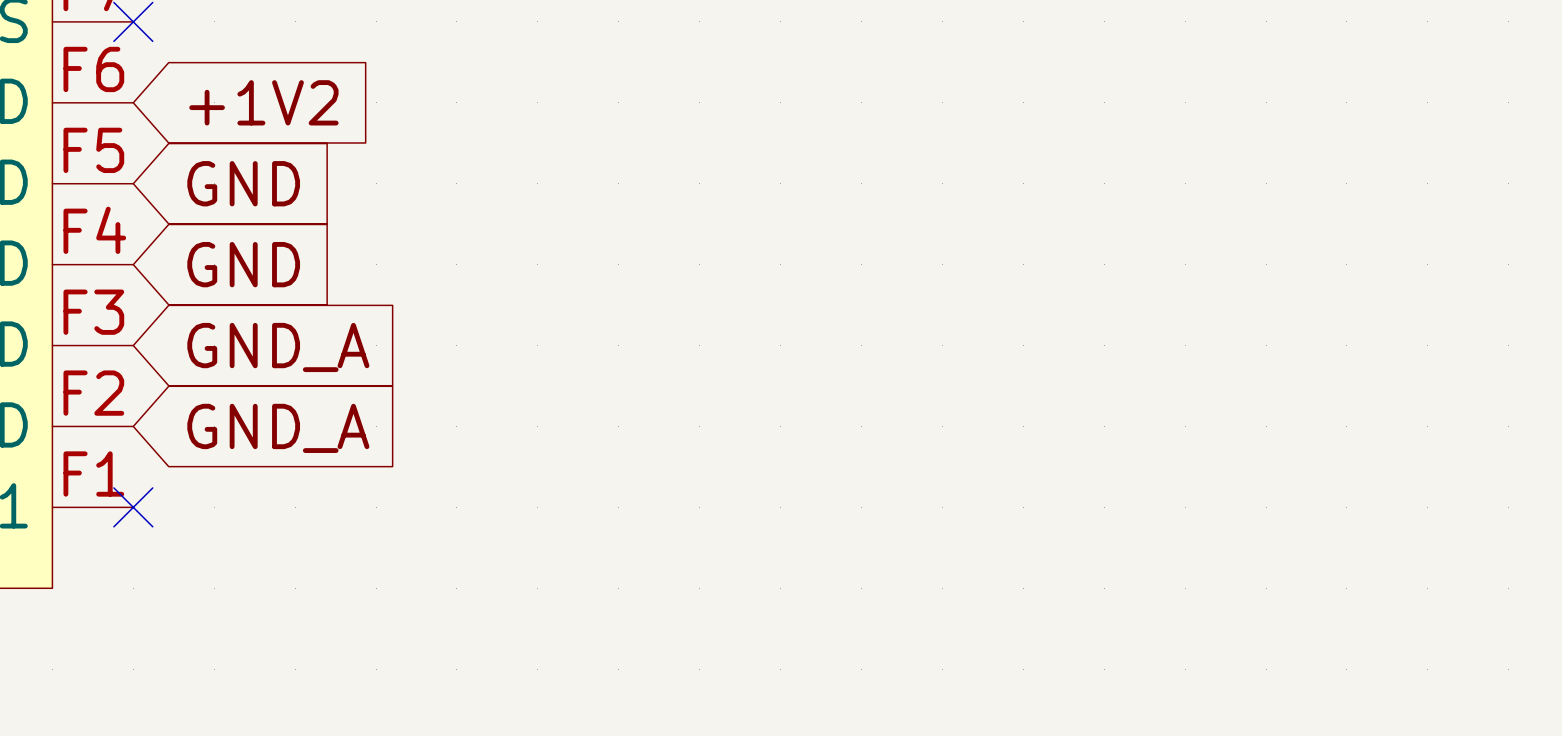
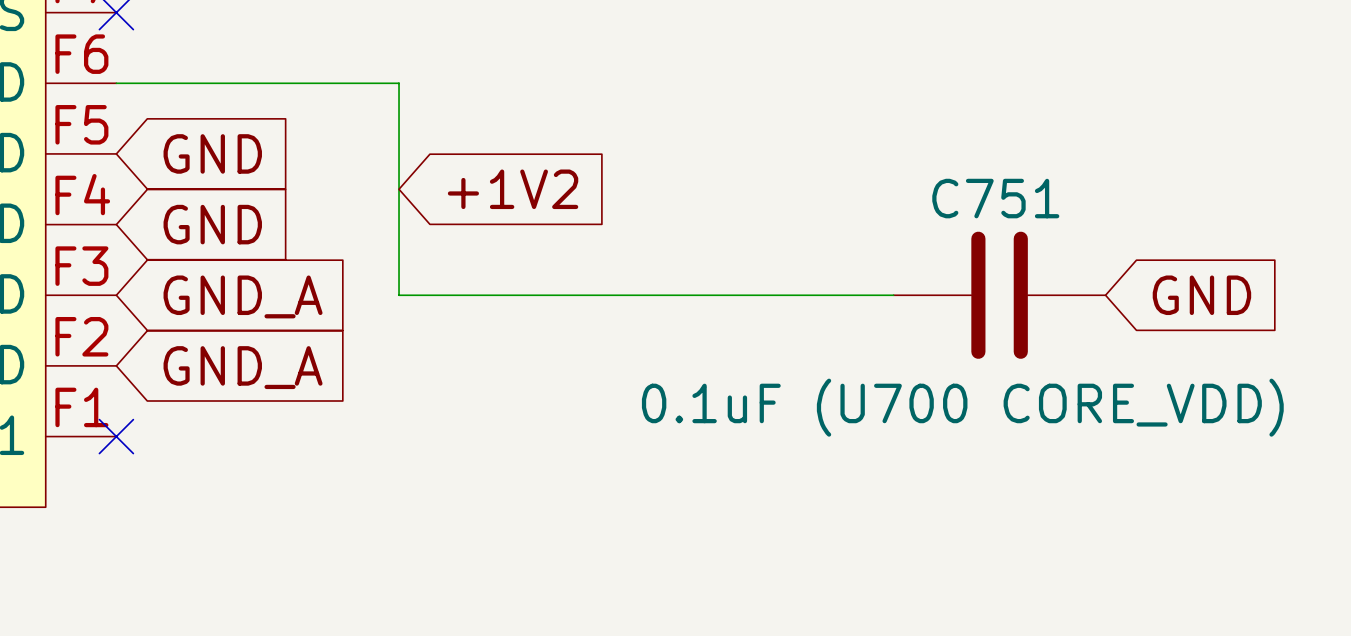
wire: none -> (116, 83) (399, 83) (399, 295) (893, 295)
global label position: +1V2 (263, 102) -> +1V2 (513, 189)
C751: none -> 0.1uF (U700 CORE_VDD) (999, 295)
global label: none -> GND (1201, 295)

